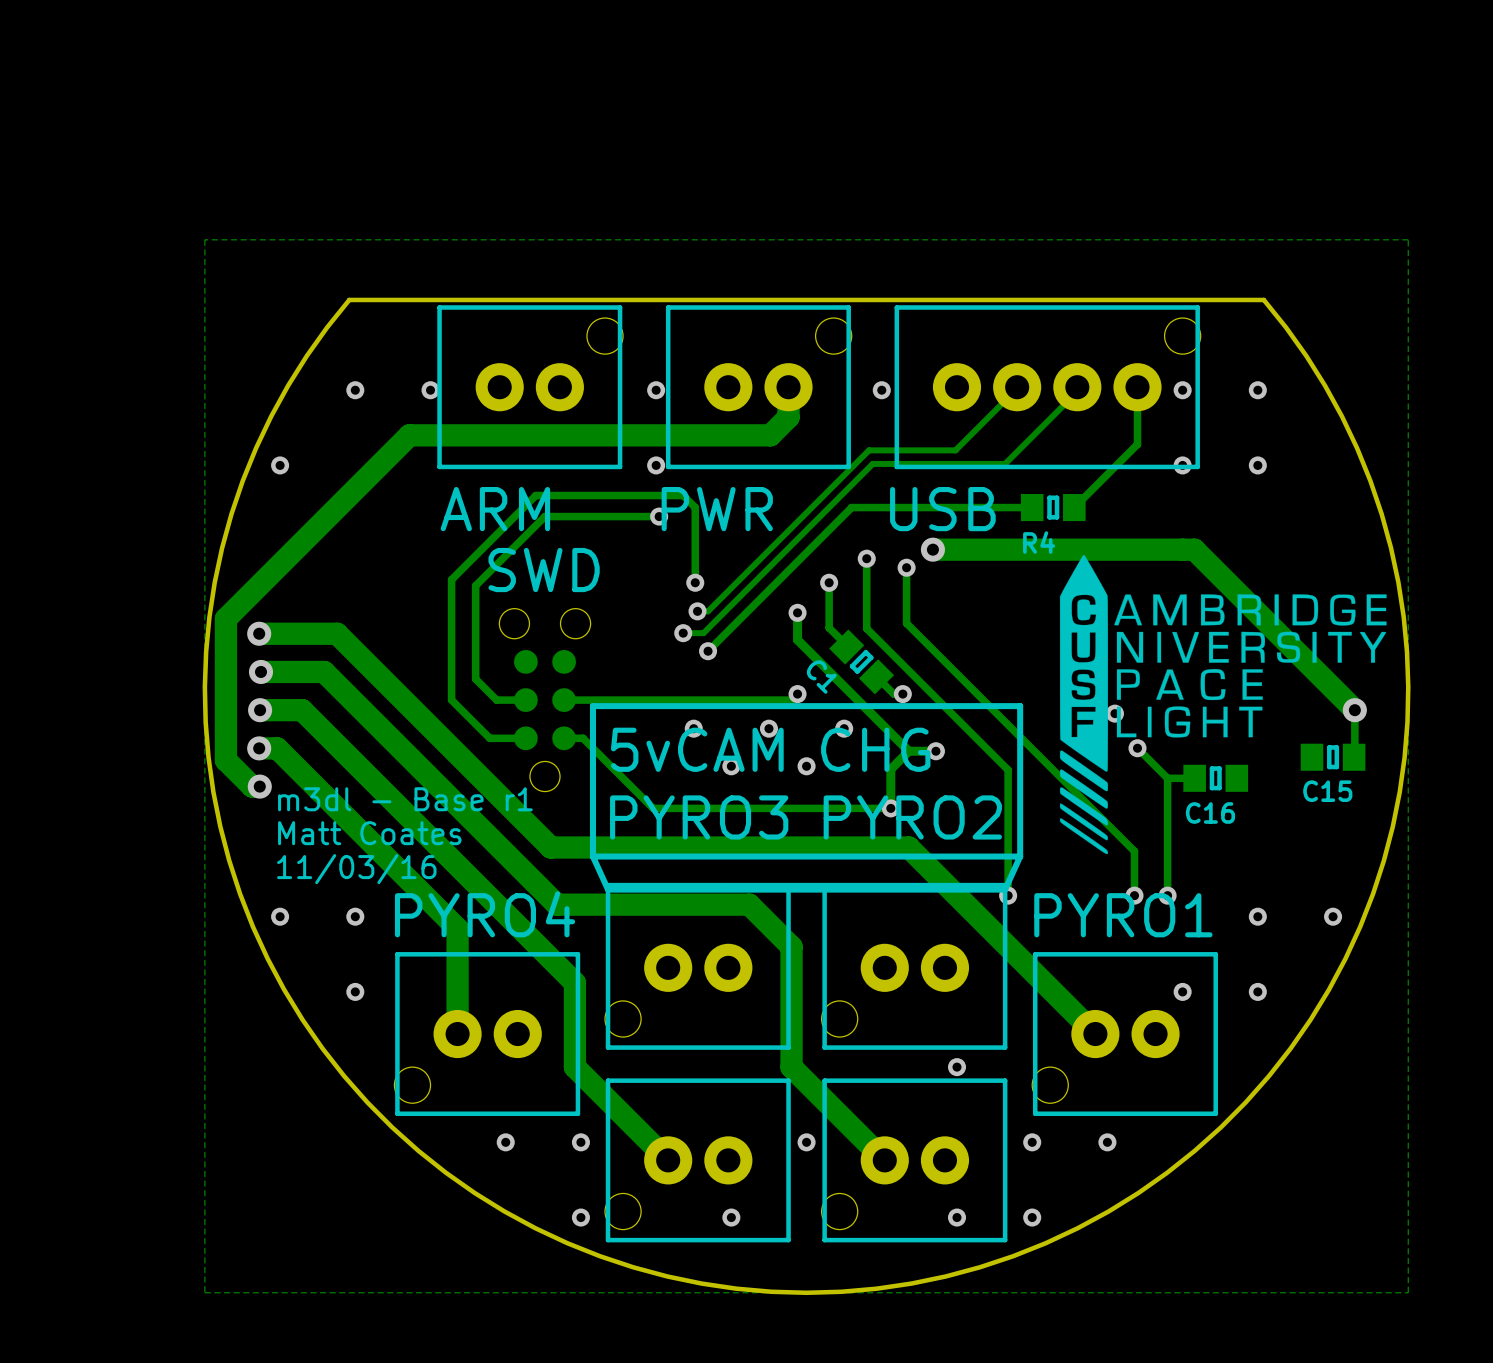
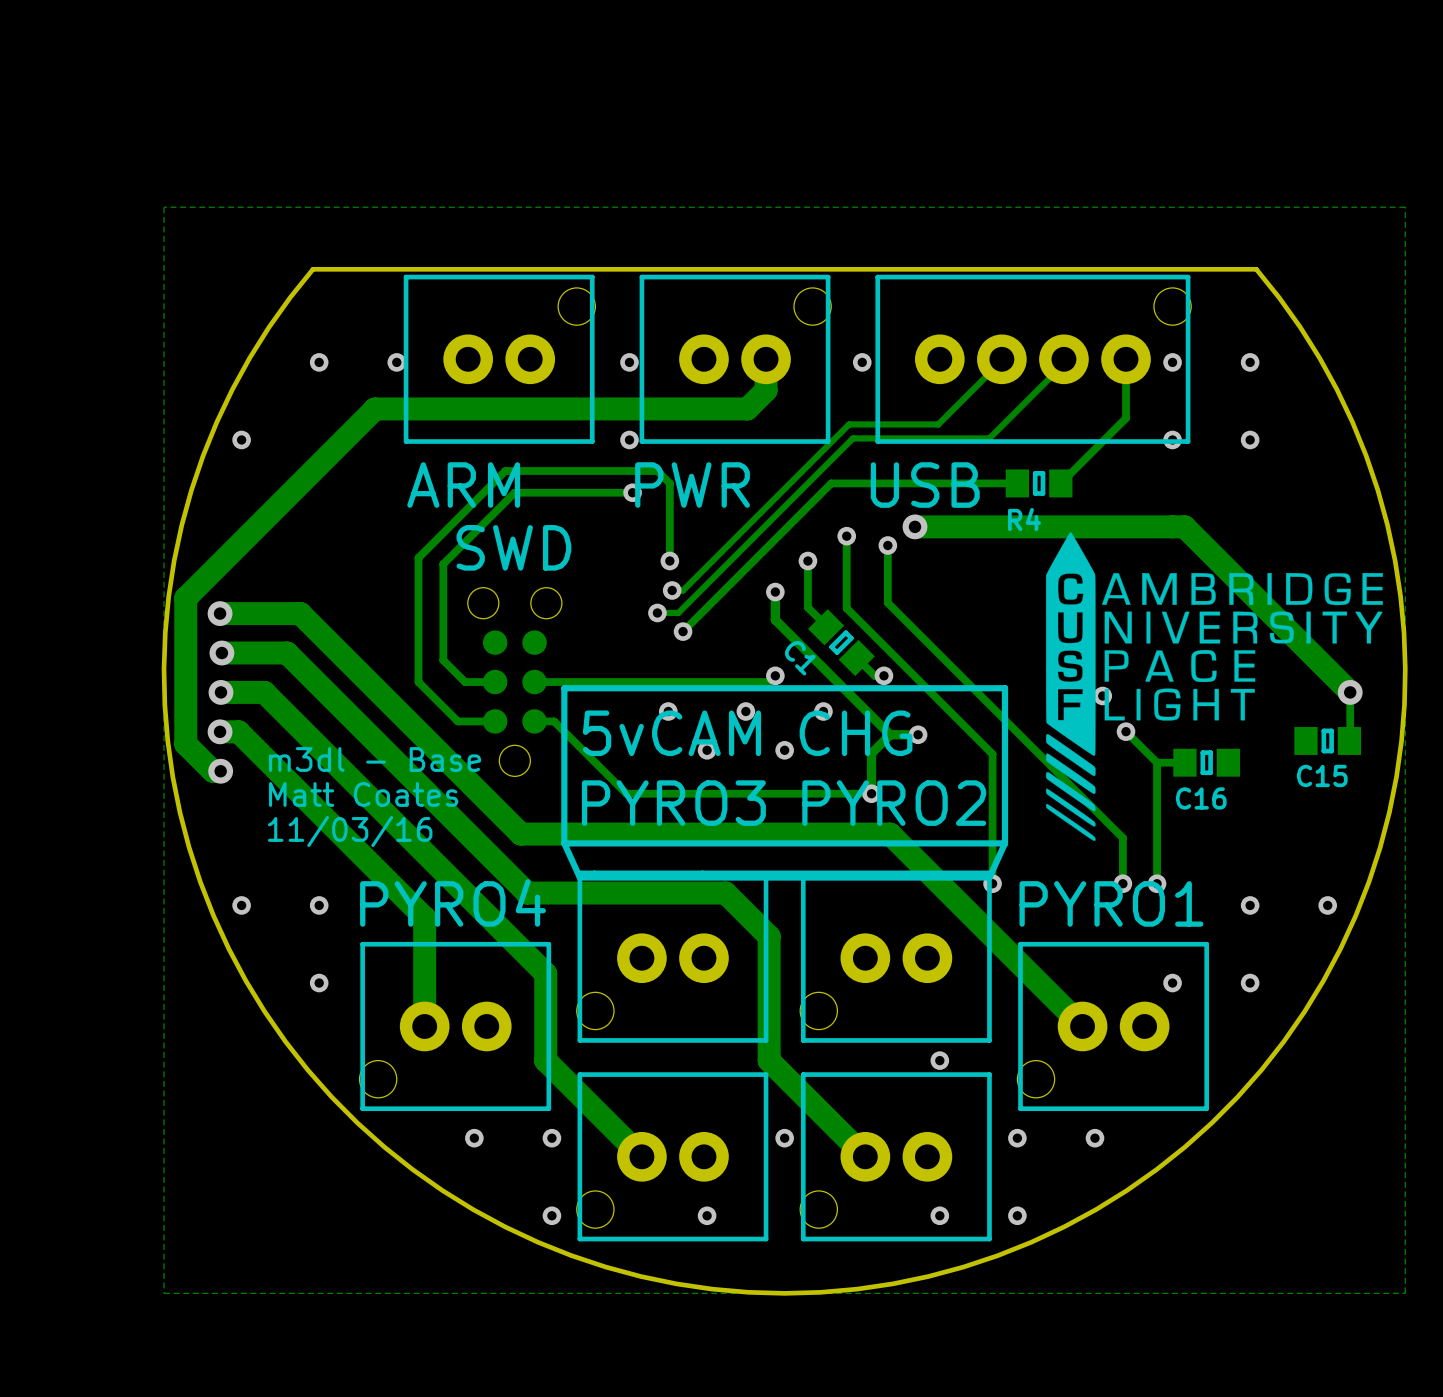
text: m3dl - Base r1 (405, 799) -> m3dl - Base (375, 759)
text position: Matt Coates (369, 833) -> Matt Coates (363, 794)
text position: 11/03/16 (356, 869) -> 11/03/16 (350, 831)

